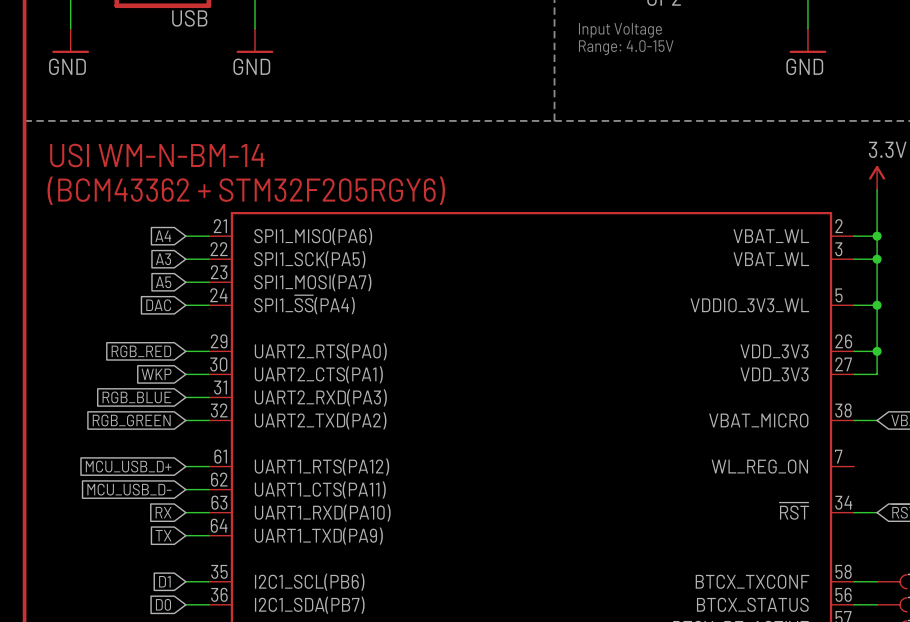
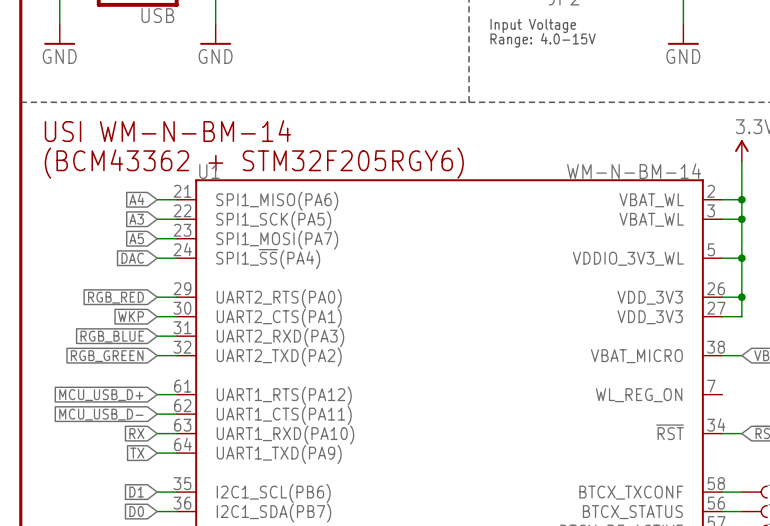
U1 name: none -> U1 (209, 171)
U1 value: none -> WM-N-BM-14 (634, 171)

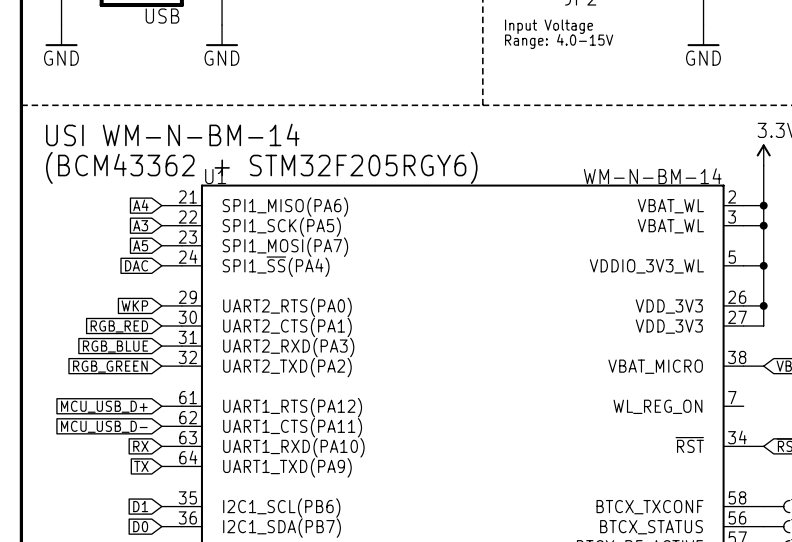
global label: RGB_RED (115, 297) -> WKP (134, 305)
global label: WKP (131, 316) -> RGB_RED (119, 326)

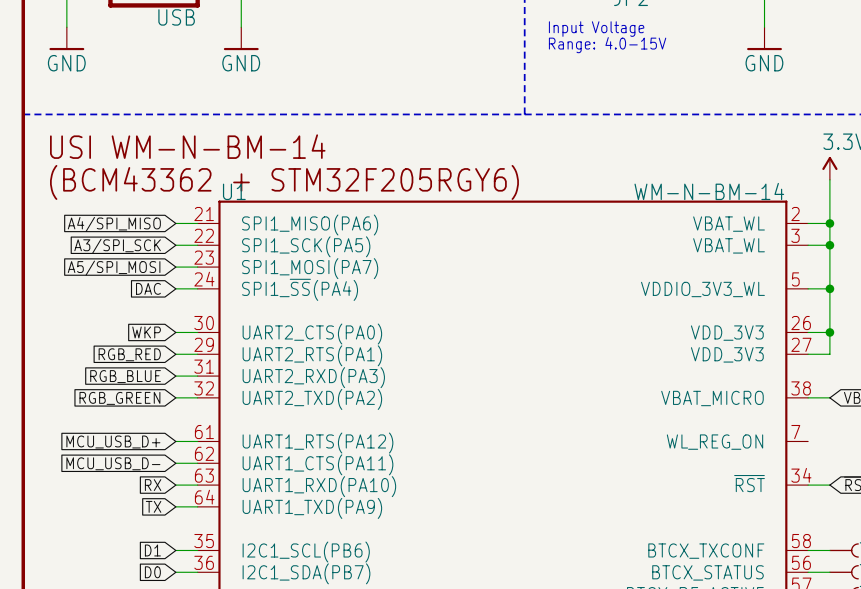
global label: A4 (140, 205) -> A4/SPI_MISO (114, 224)
global label: A3 (140, 225) -> A3/SPI_SCK (117, 246)
global label: A5 (140, 245) -> A5/SPI_MOSI (114, 268)
U1 pin number: 29 (187, 297) -> 30 (204, 323)
U1 pin name: UART2_RTS(PA0) (287, 307) -> UART2_CTS(PA0) (312, 334)
U1 pin number: 30 (187, 317) -> 29 (204, 344)
U1 pin name: UART2_CTS(PA1) (287, 327) -> UART2_RTS(PA1) (312, 355)

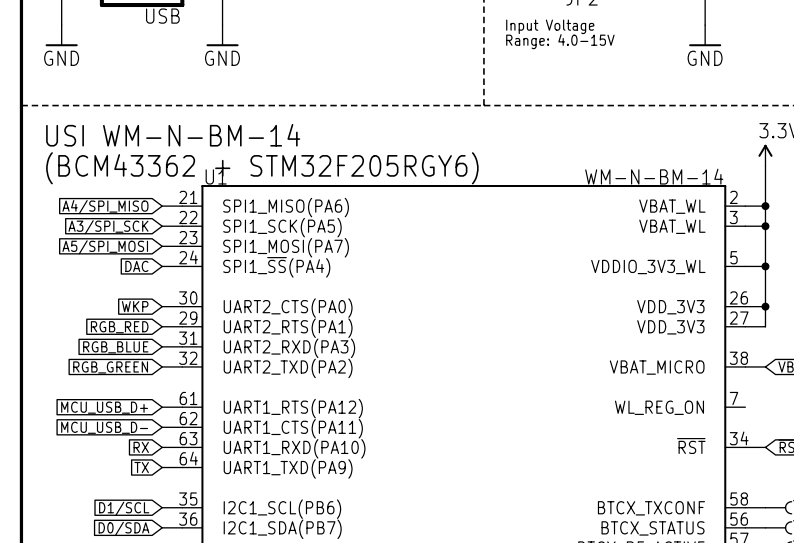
global label: D1 (152, 550) -> D1/SCL (124, 508)
global label: D0 (152, 572) -> D0/SDA (123, 528)

